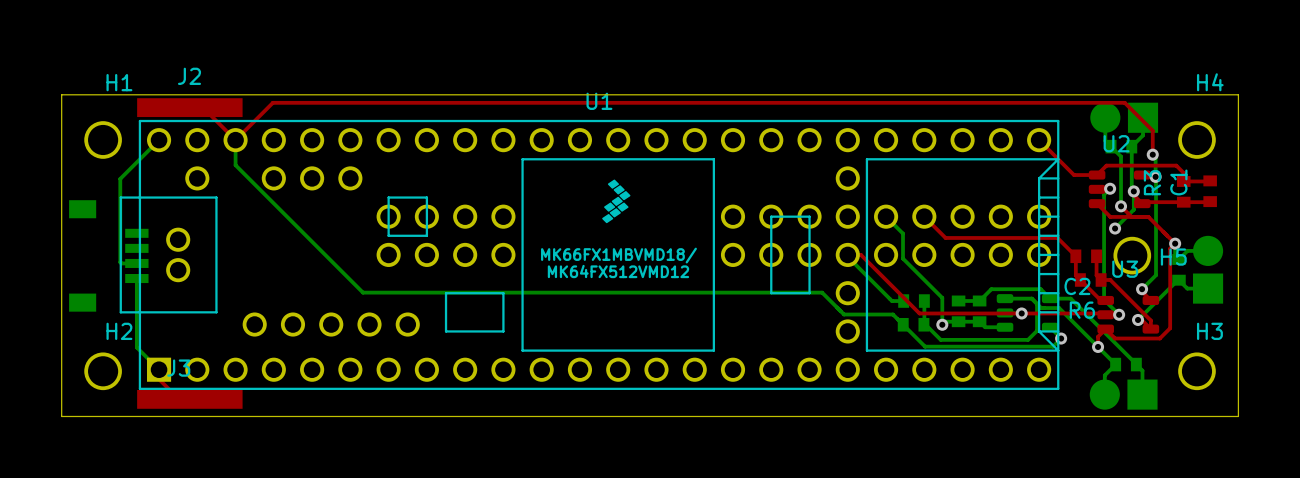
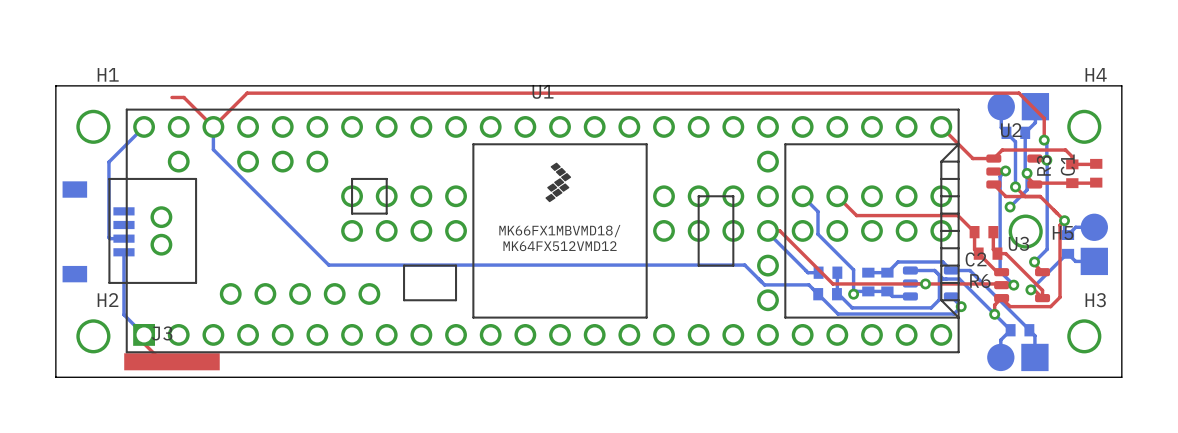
J2: (189, 107) -> none

